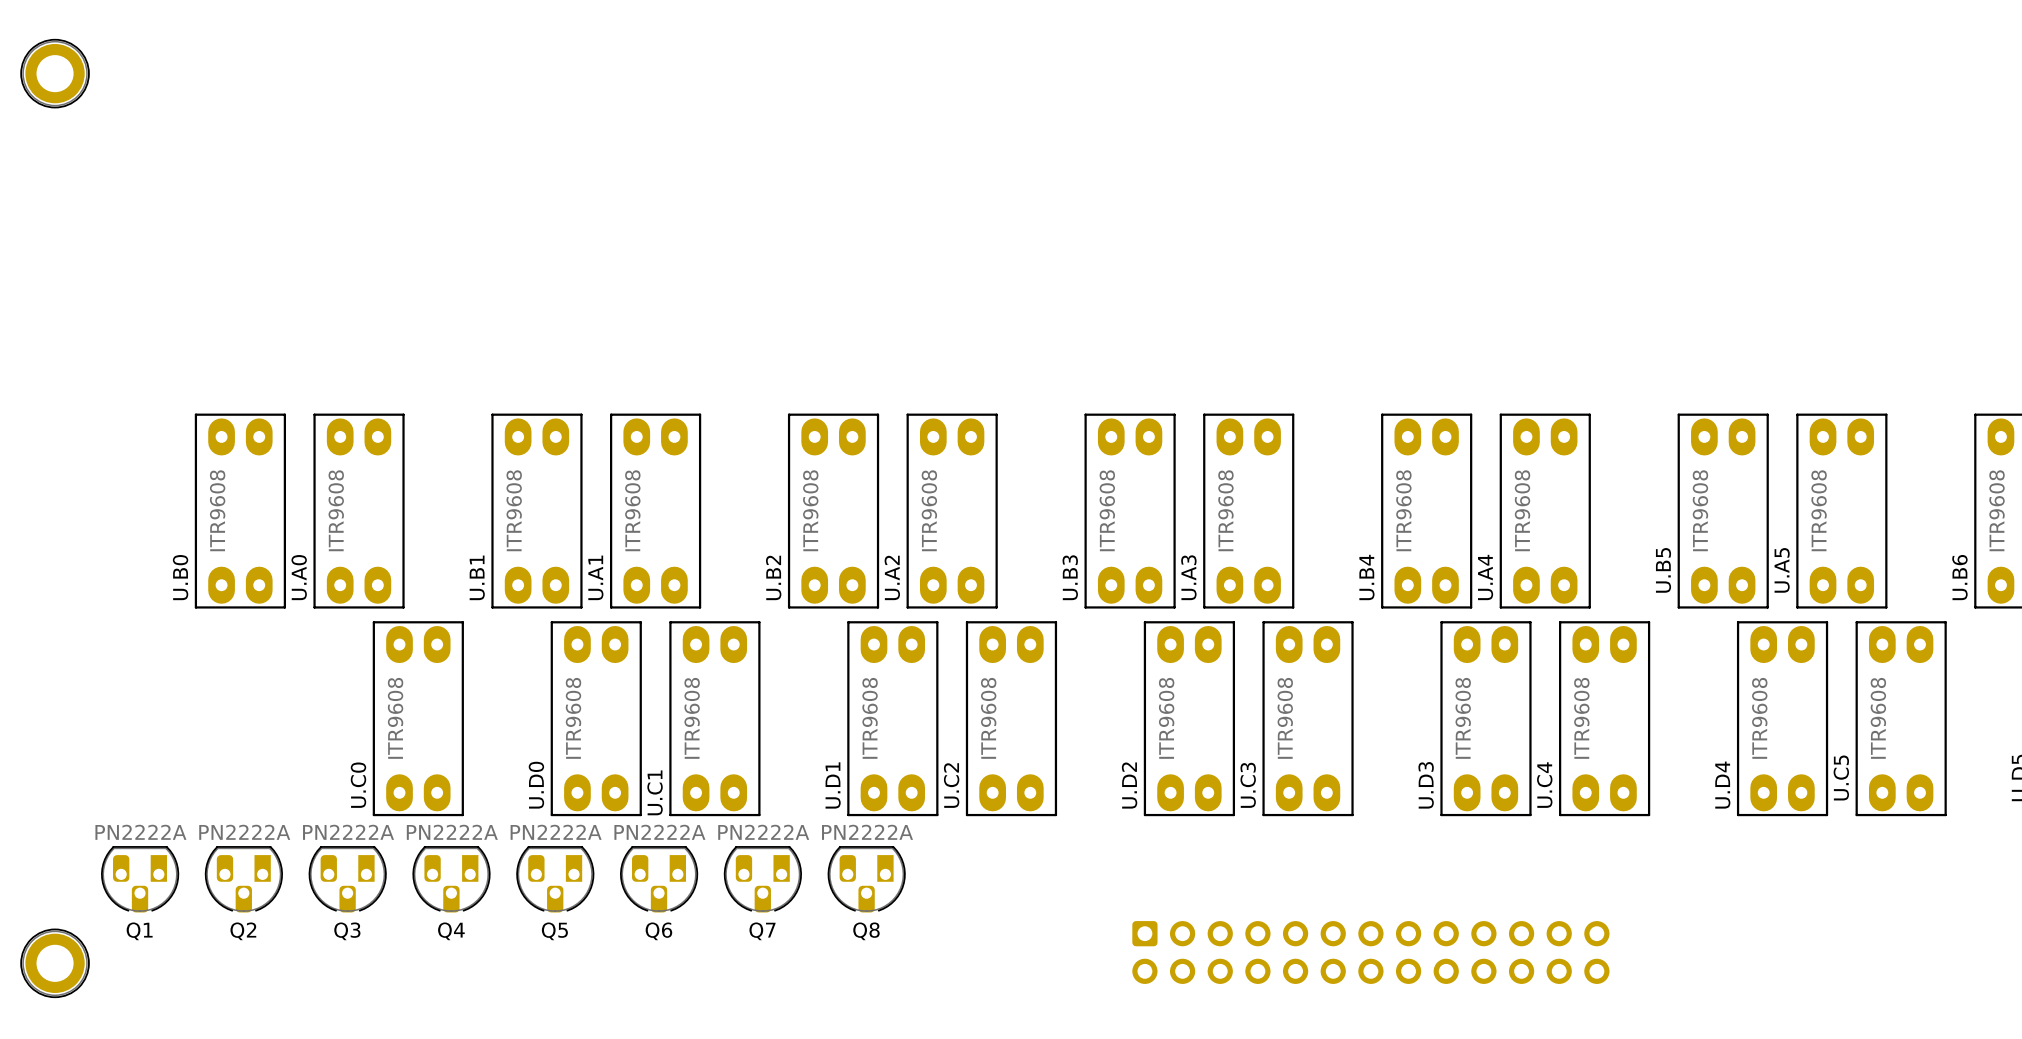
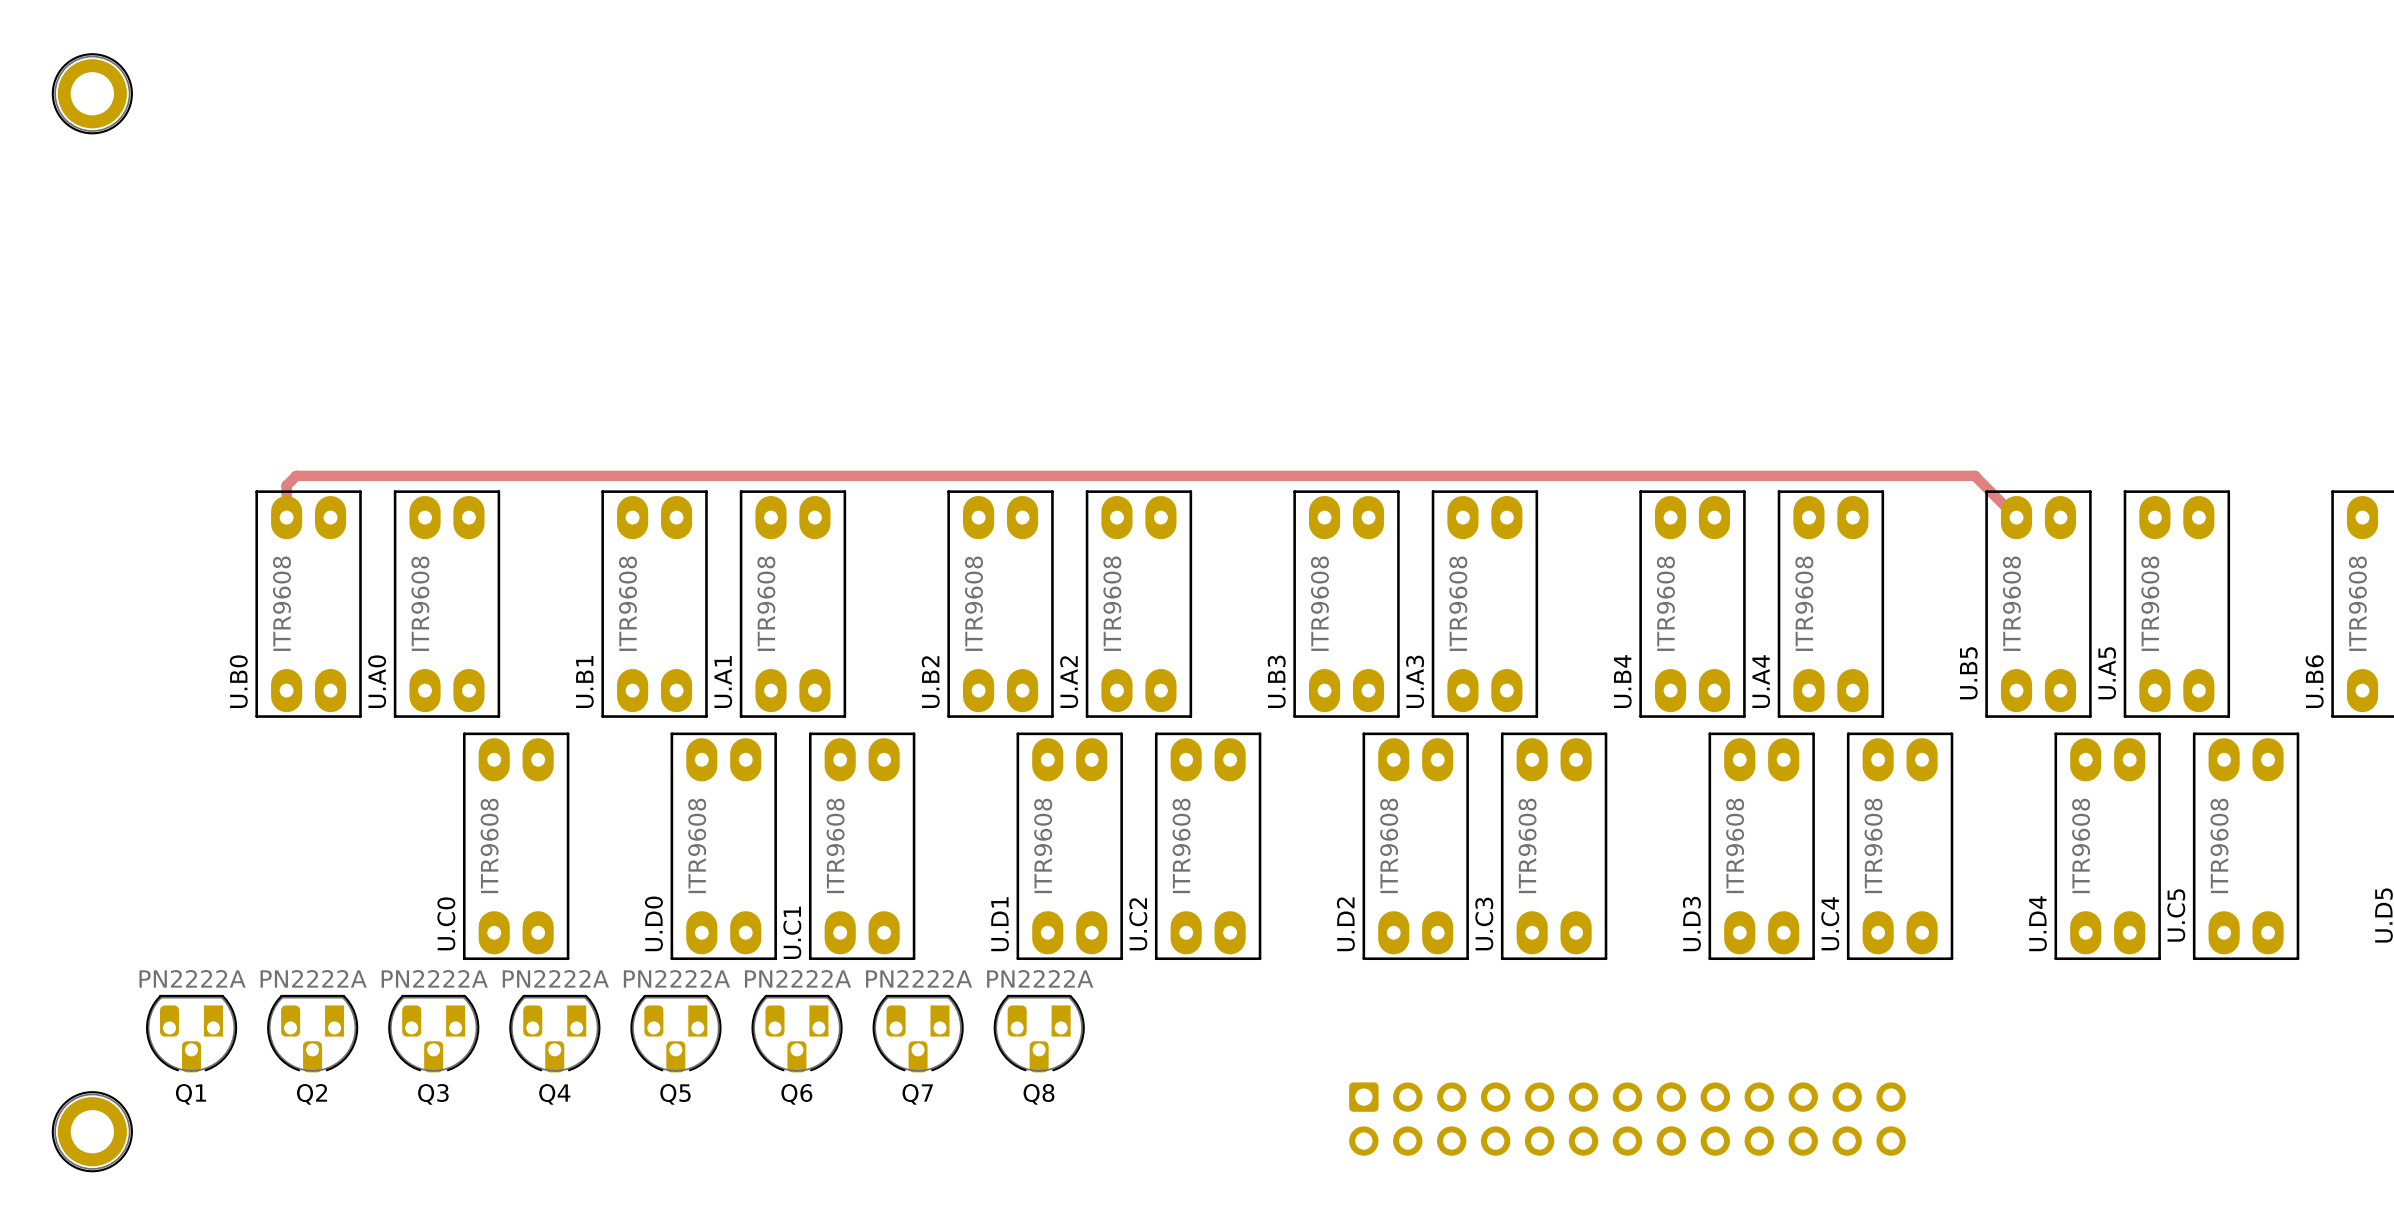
track: none -> (286, 517) (286, 485) (296, 475) (1974, 475) (2016, 517)

